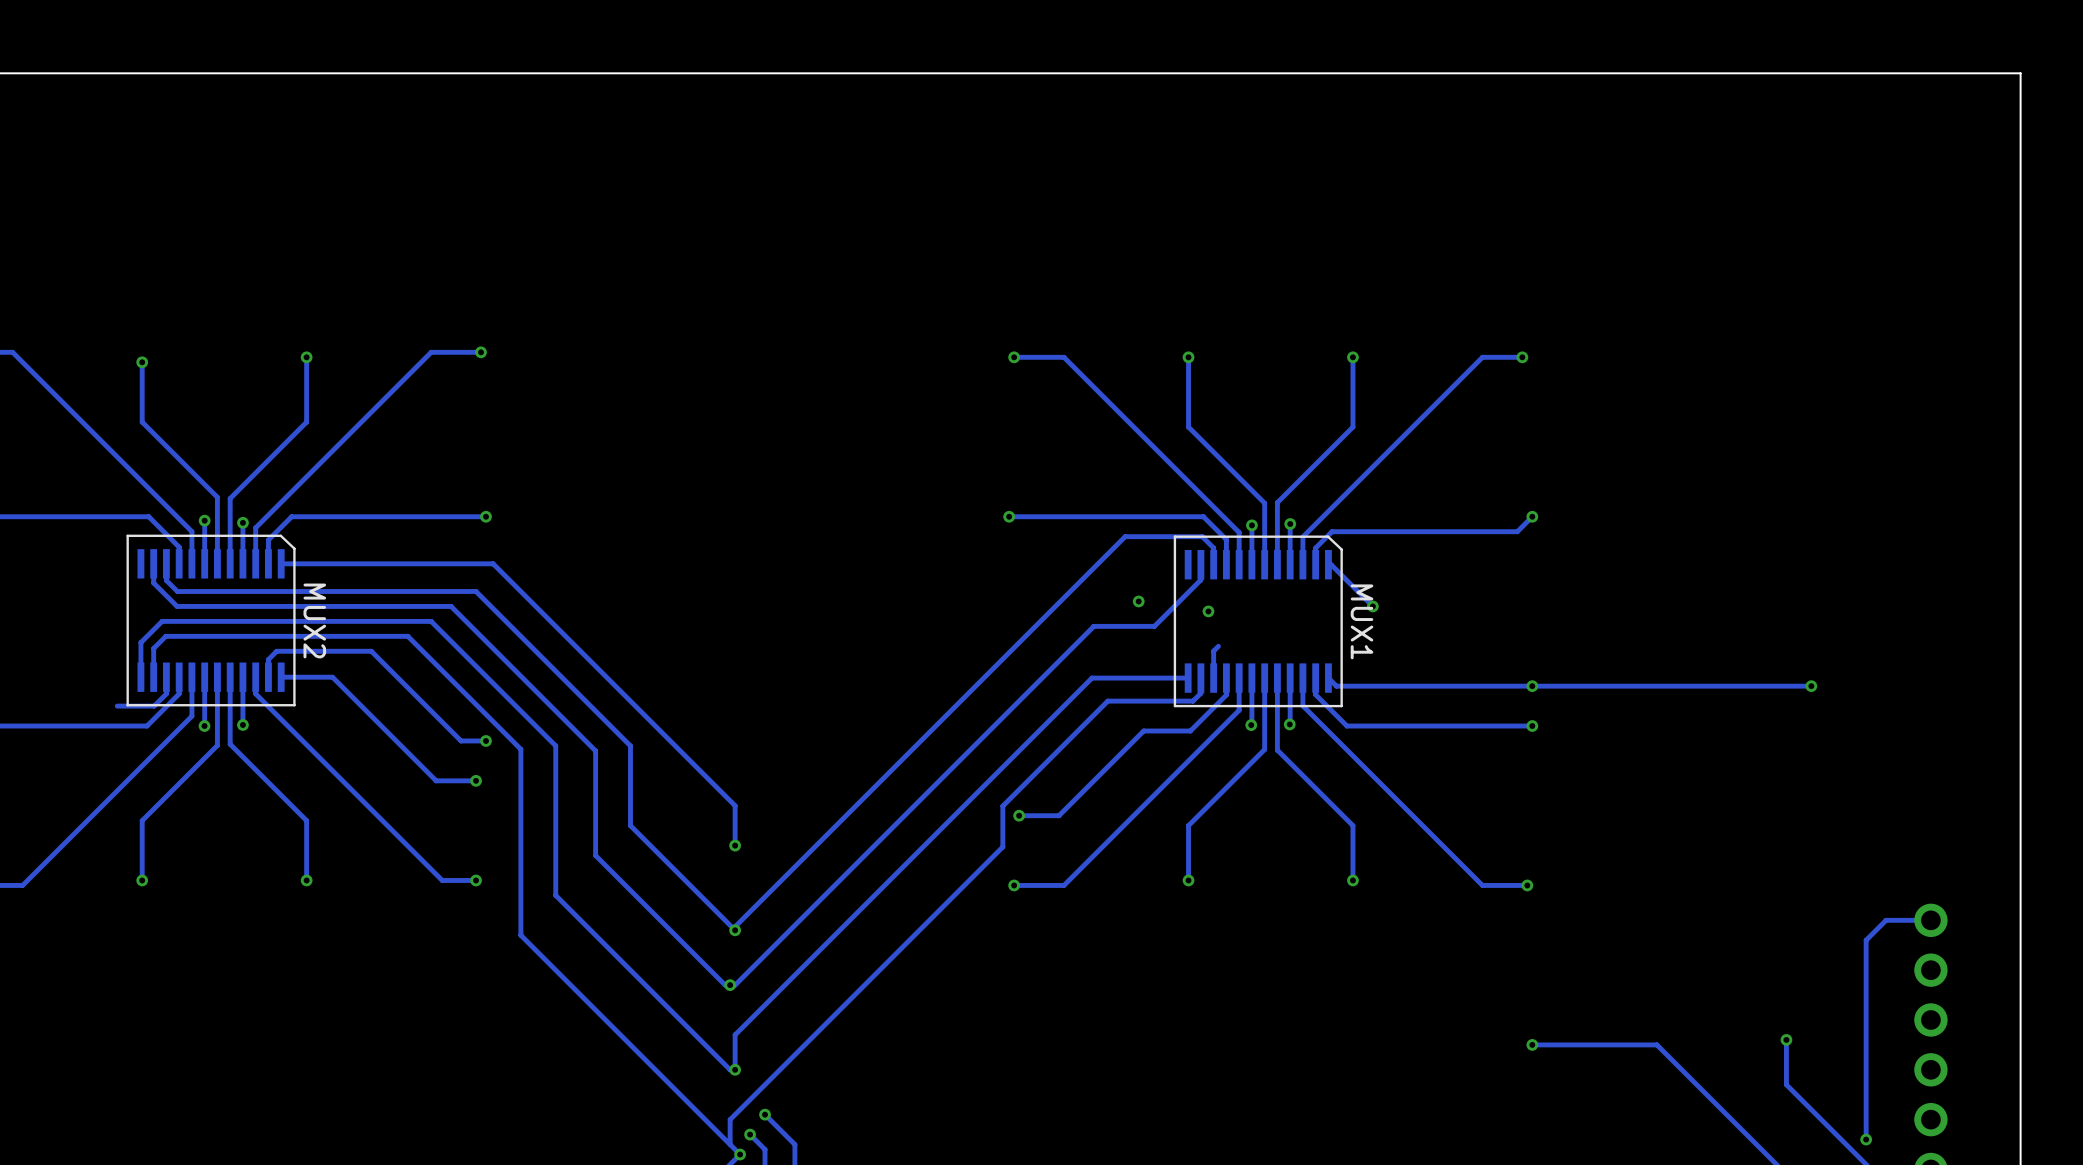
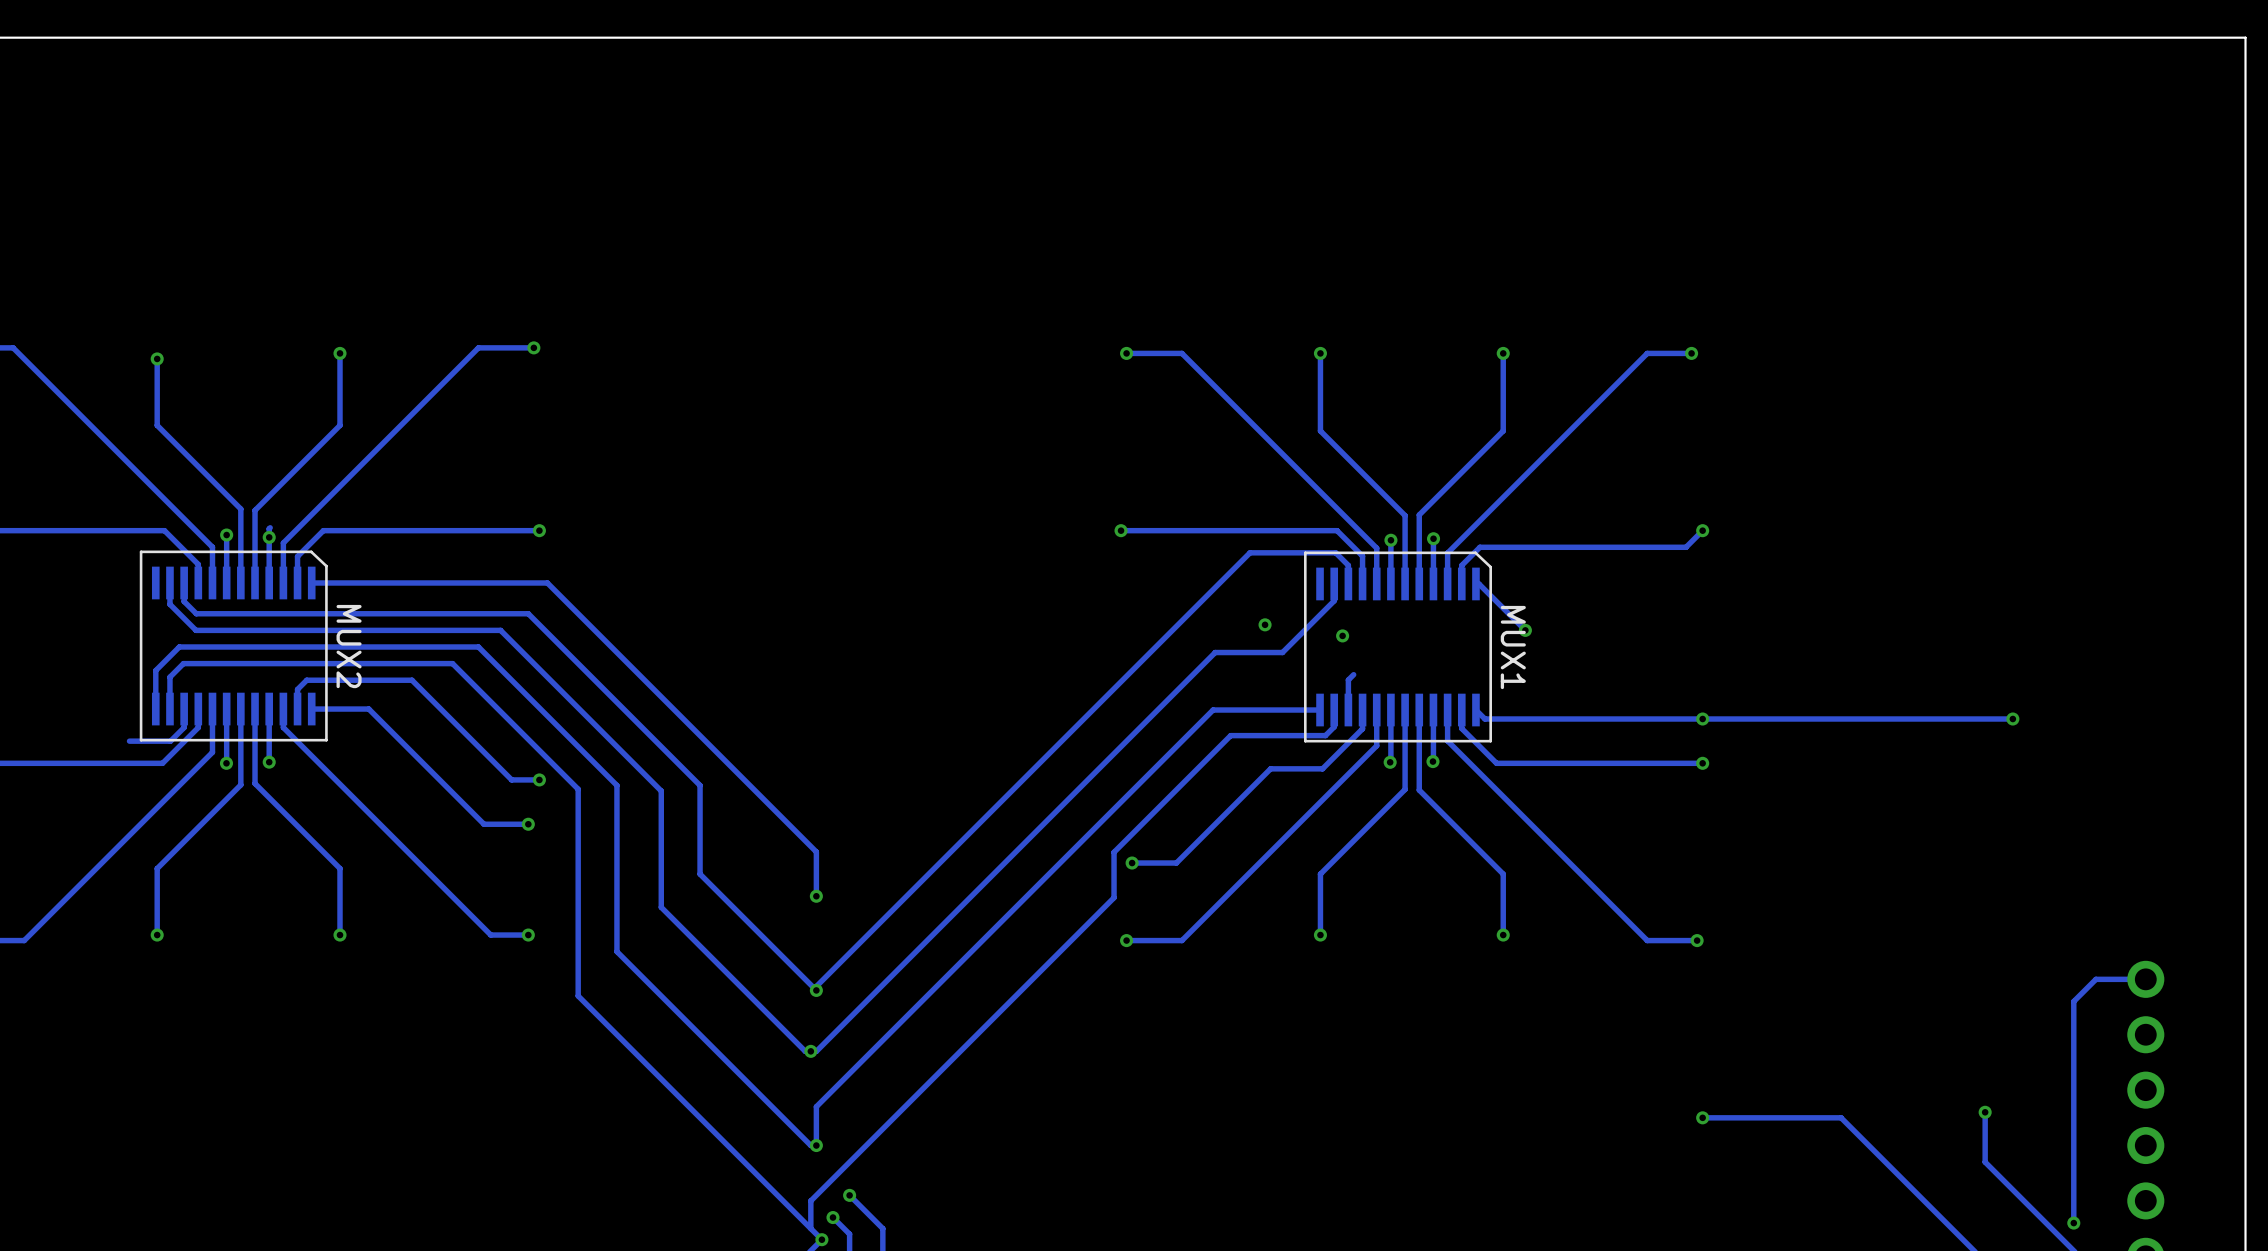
track: none -> (270, 527) (269, 537)

